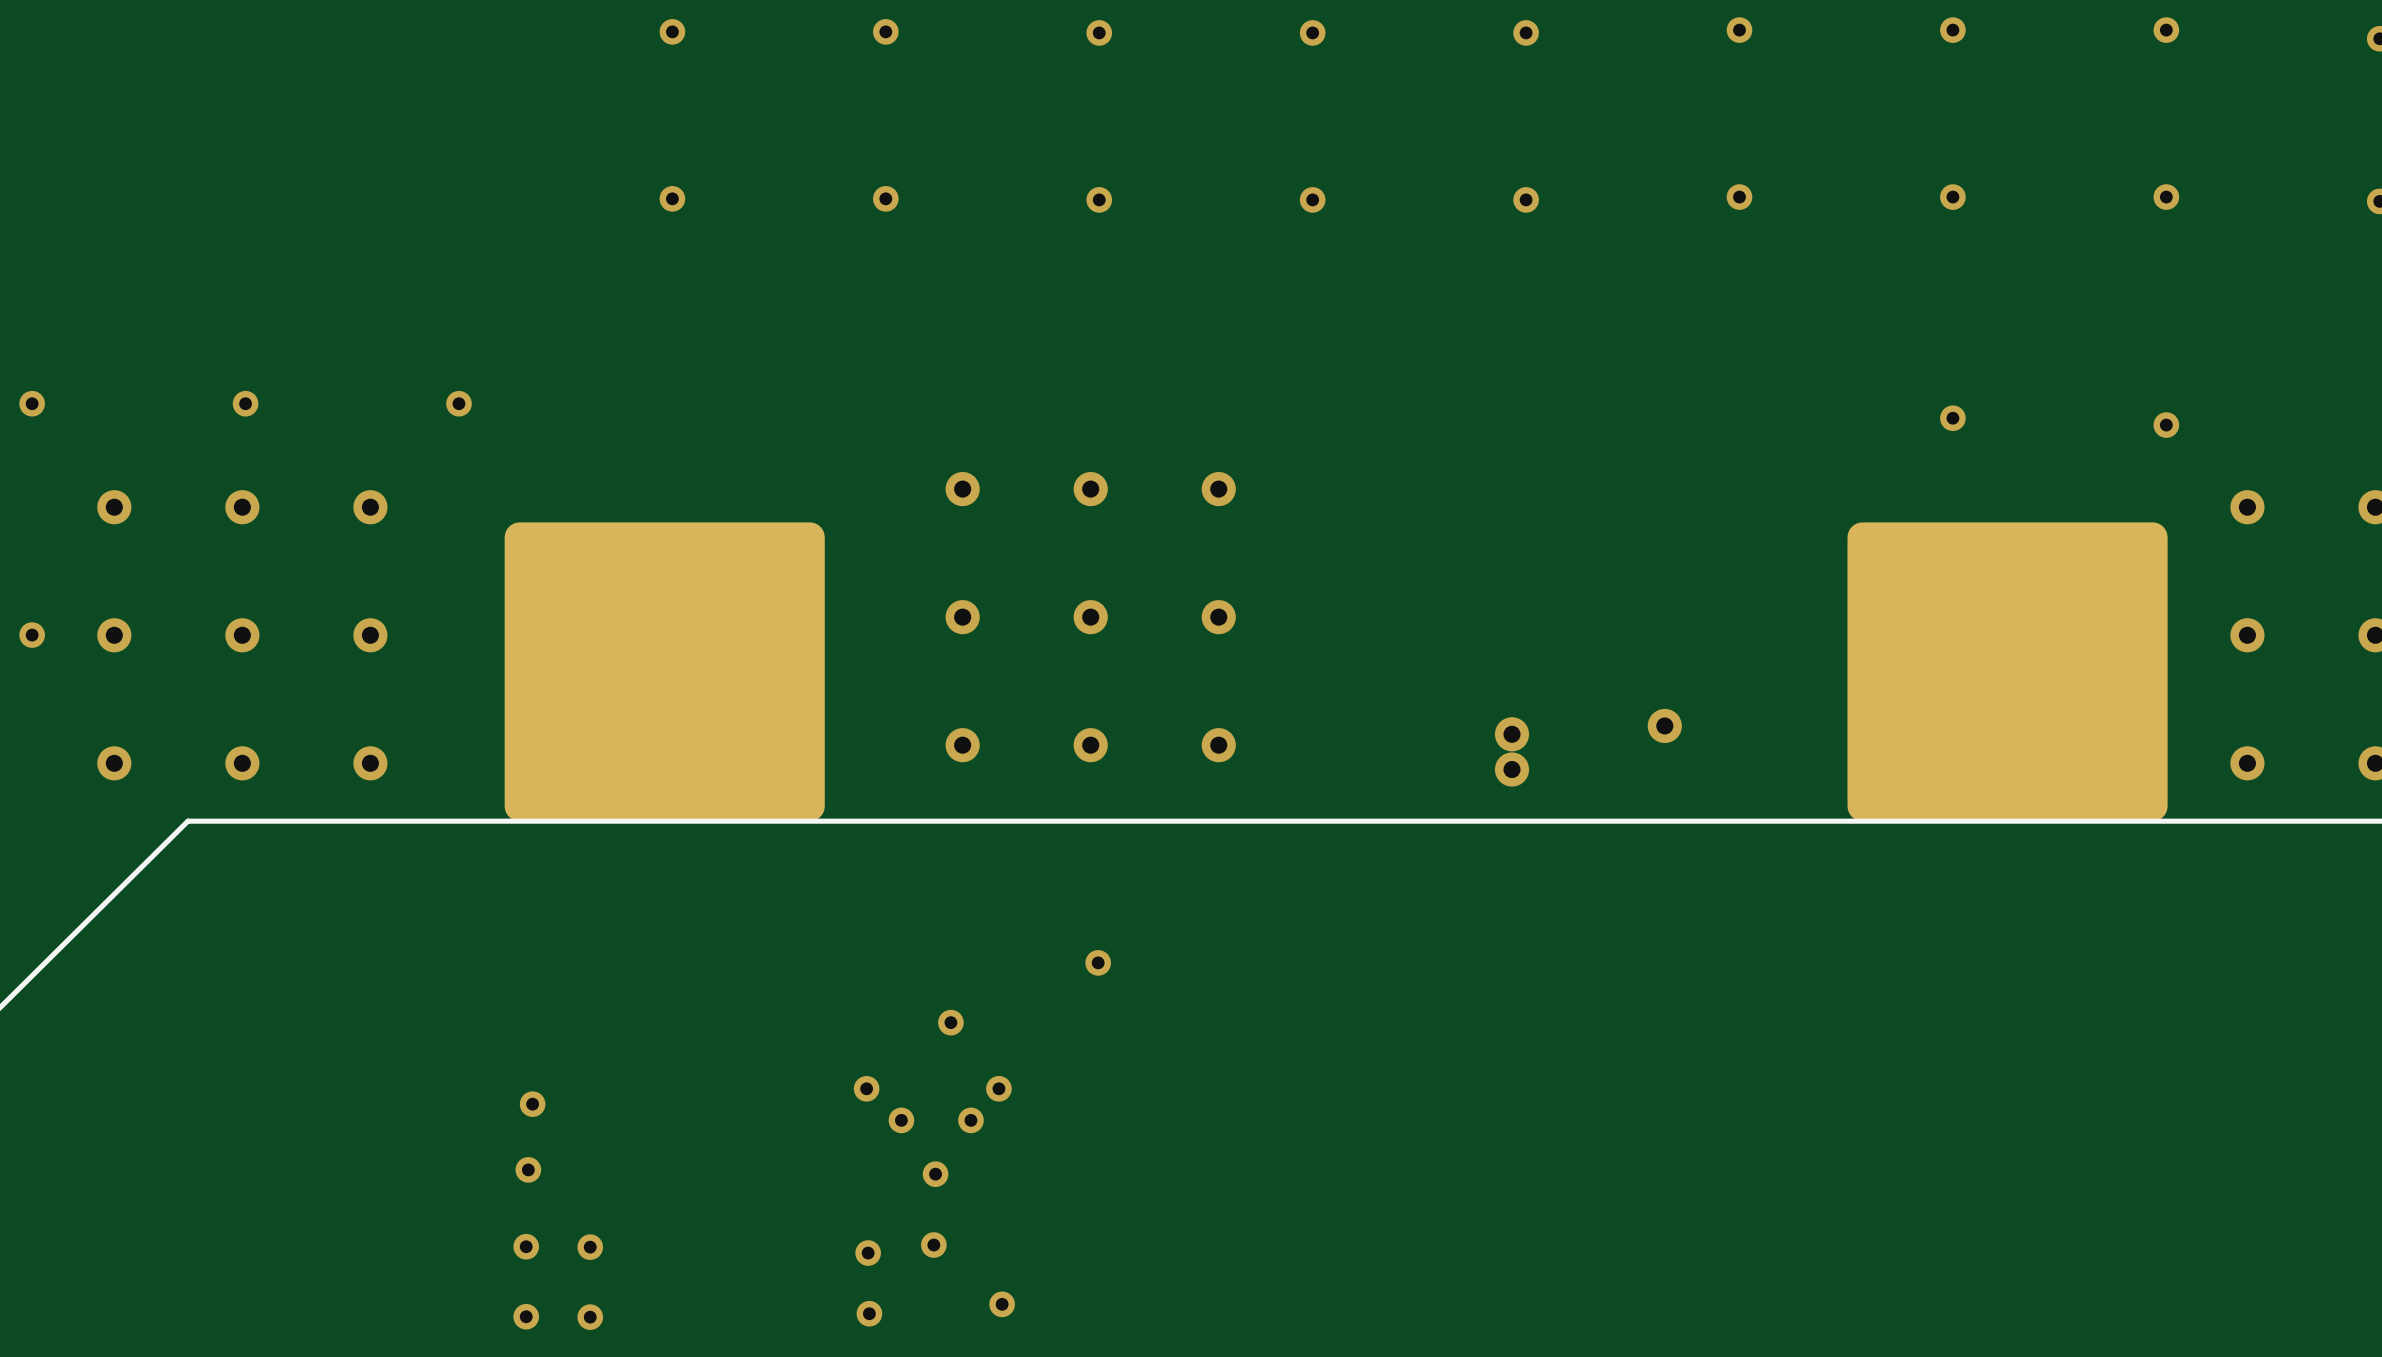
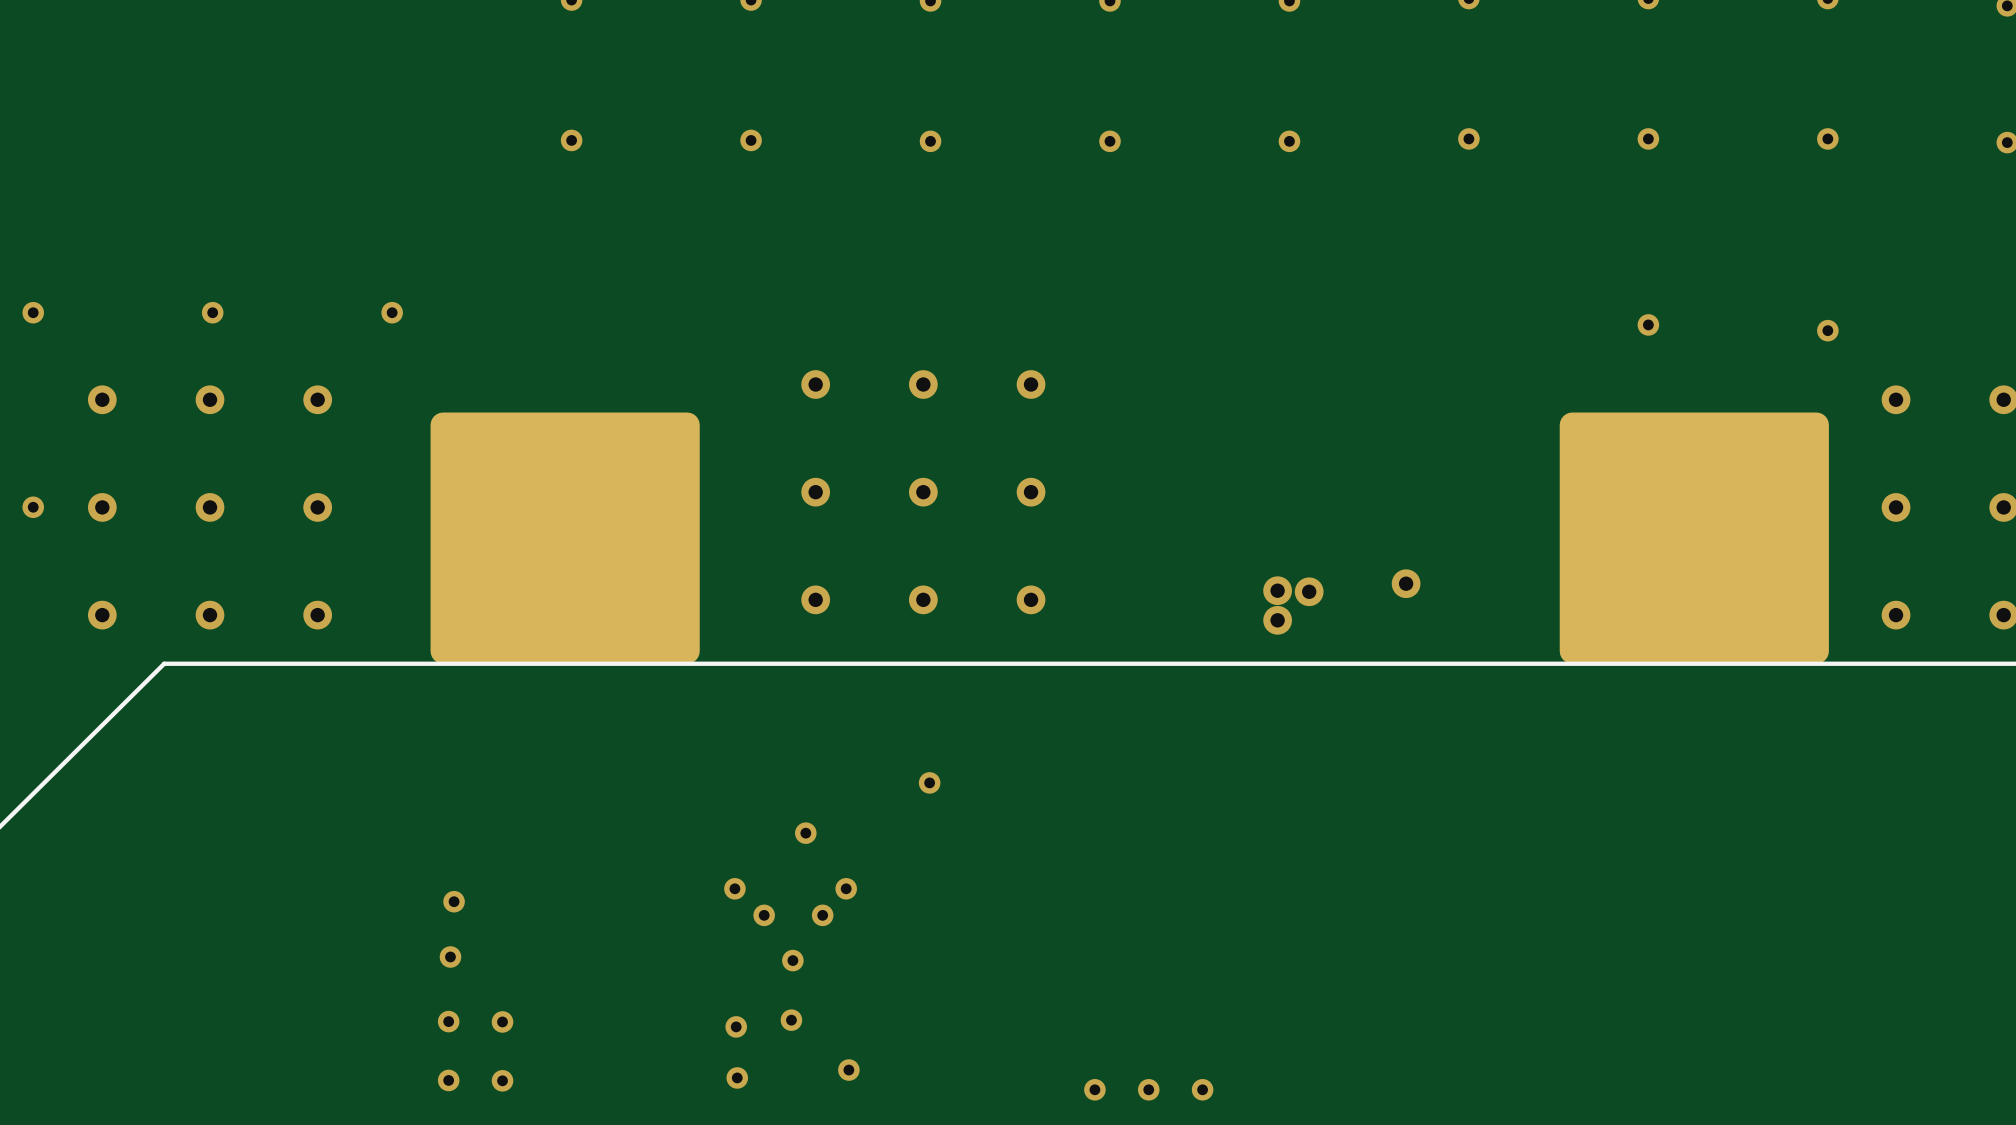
via: none -> (1309, 591)
via: none -> (1094, 1089)
via: none -> (1148, 1089)
via: none -> (1202, 1089)

